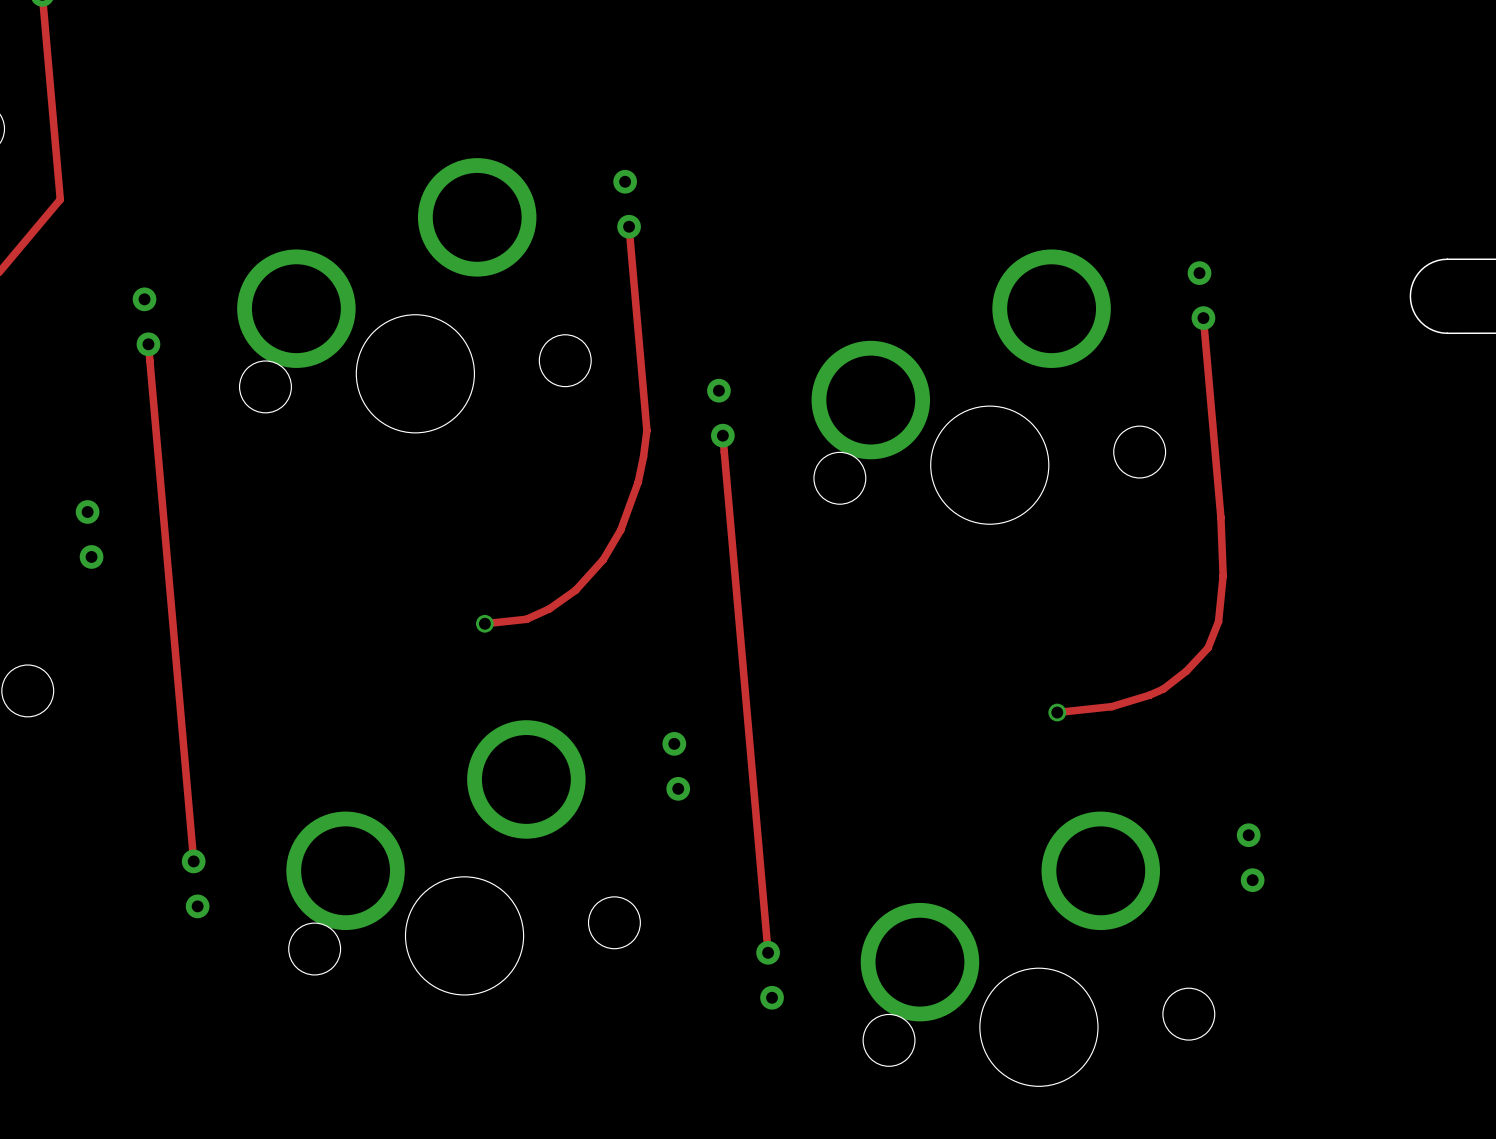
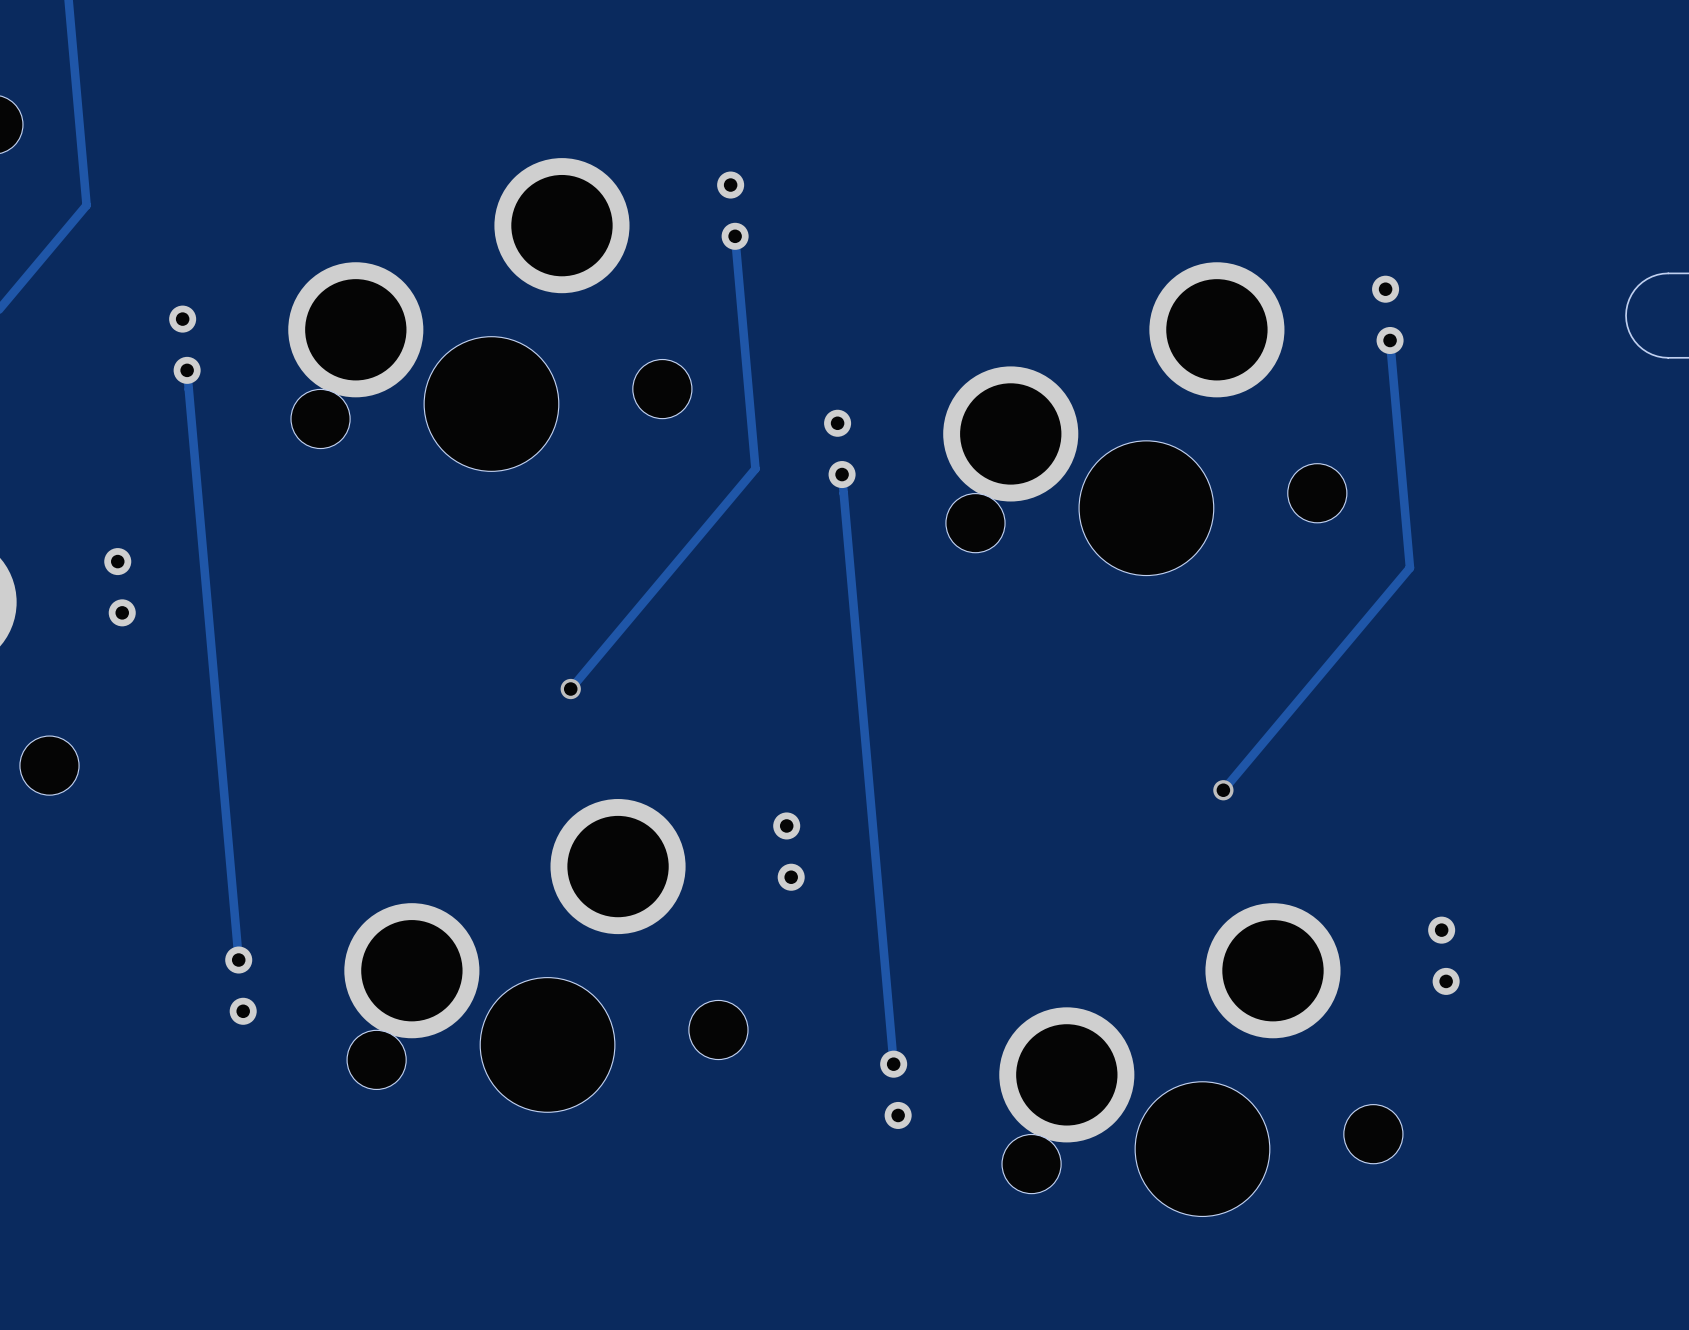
track: (646, 430) (638, 482) (620, 530) (603, 559) (575, 590) (549, 608) (526, 619) (484, 623) -> (755, 468) (570, 689)
track: (1220, 517) (1223, 575) (1218, 621) (1208, 648) (1186, 670) (1163, 689) (1149, 695) (1111, 706) (1057, 712) -> (1409, 567) (1223, 790)

